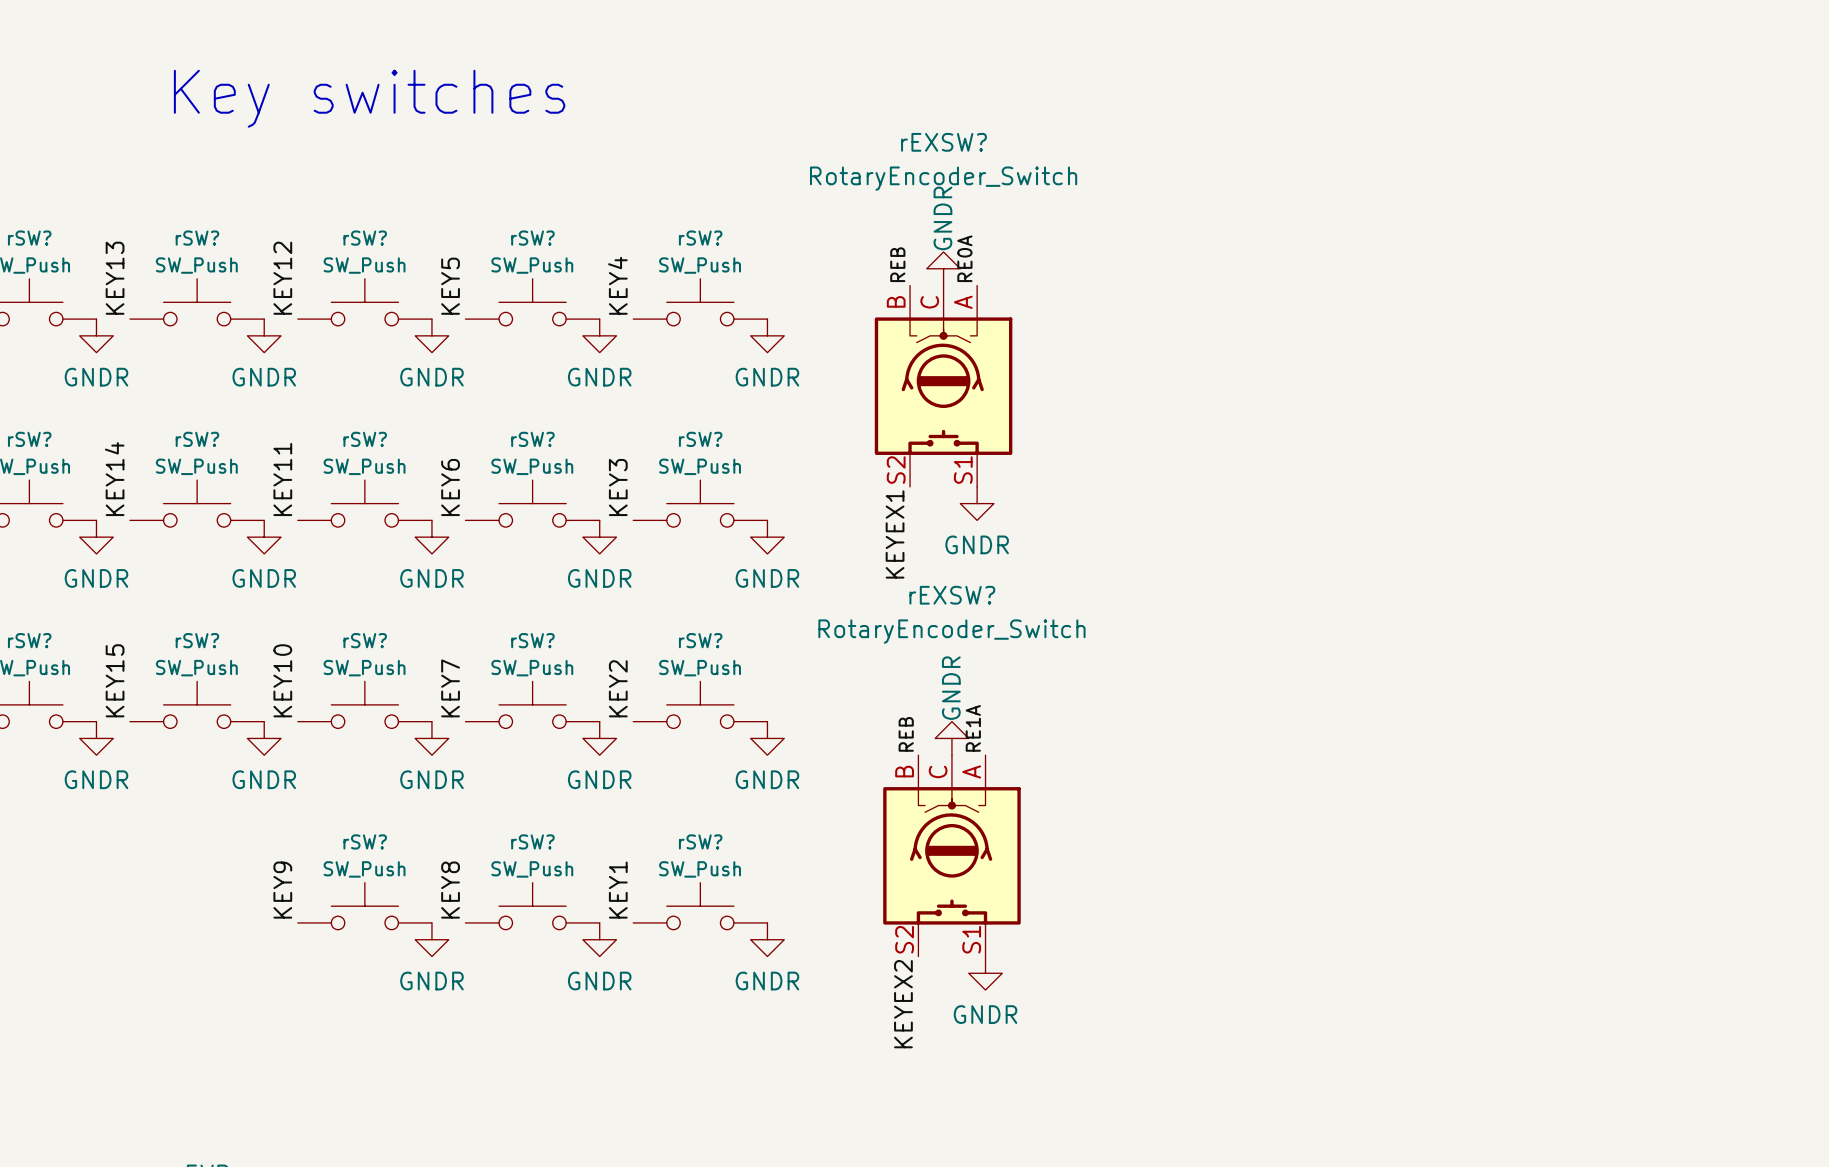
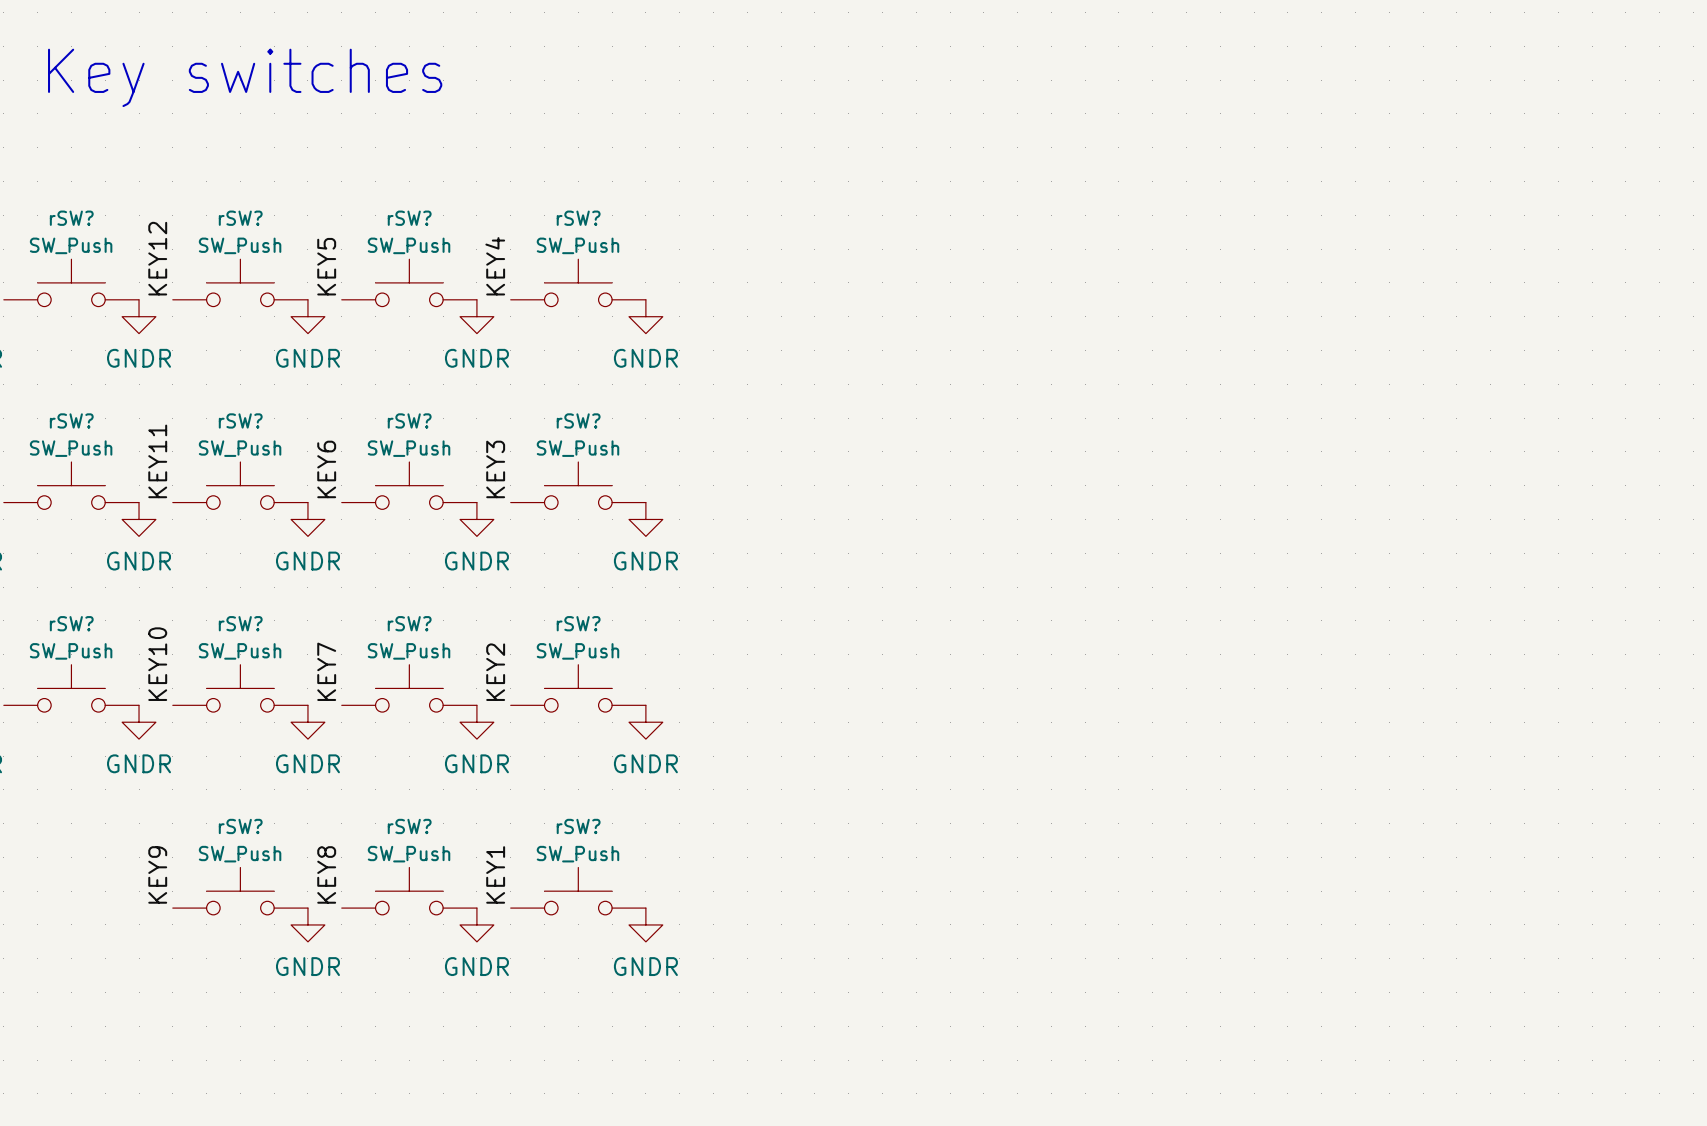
label: RE0A (964, 258) -> none
label: REB (897, 264) -> none
power symbol: GNDR (943, 268) -> none
rEXSW?: RotaryEncoder_Switch (943, 386) -> none
power symbol: GNDR (977, 503) -> none
label: KEYEX1 (895, 534) -> none
label: RE1A (973, 728) -> none
label: REB (906, 734) -> none
power symbol: GNDR (951, 738) -> none
rEXSW?: RotaryEncoder_Switch (951, 855) -> none
power symbol: GNDR (985, 973) -> none
label: KEYEX2 (903, 1004) -> none

